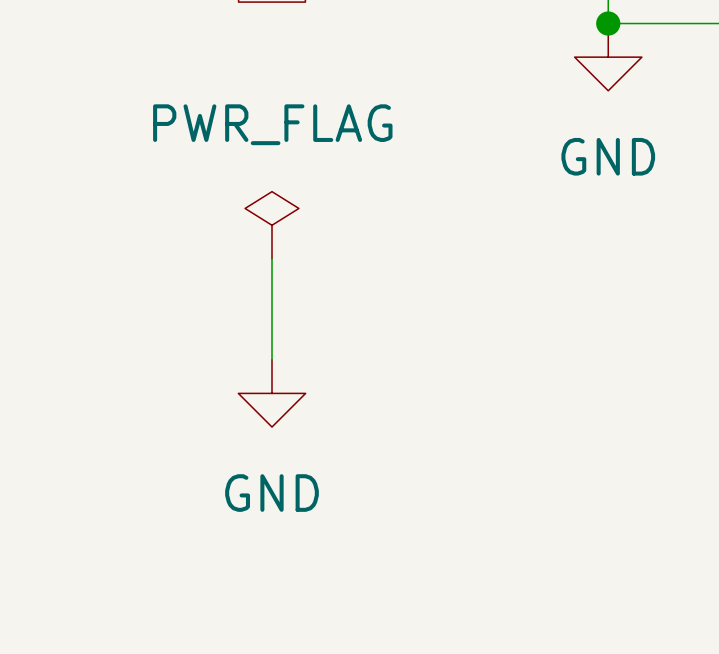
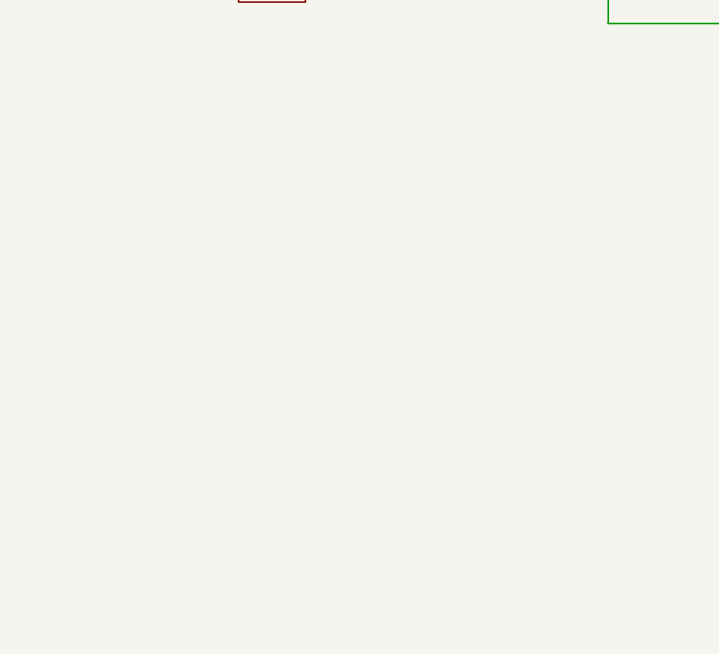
junction: (608, 23) -> none
power symbol: GND (608, 57) -> none
power symbol: PWR_FLAG (272, 225) -> none
wire: (272, 258) (272, 359) -> none
power symbol: GND (272, 393) -> none

